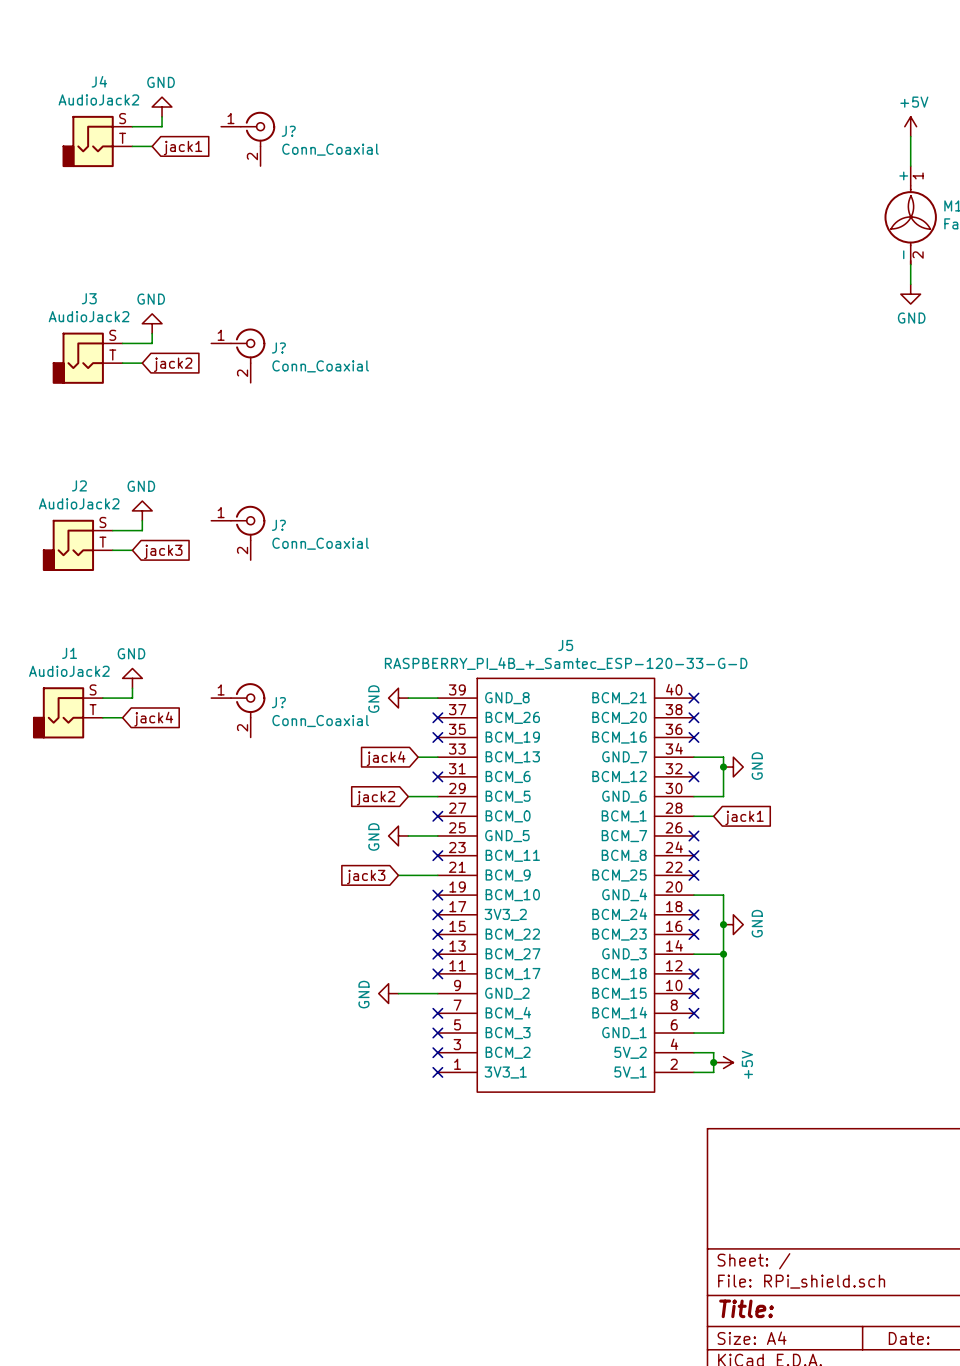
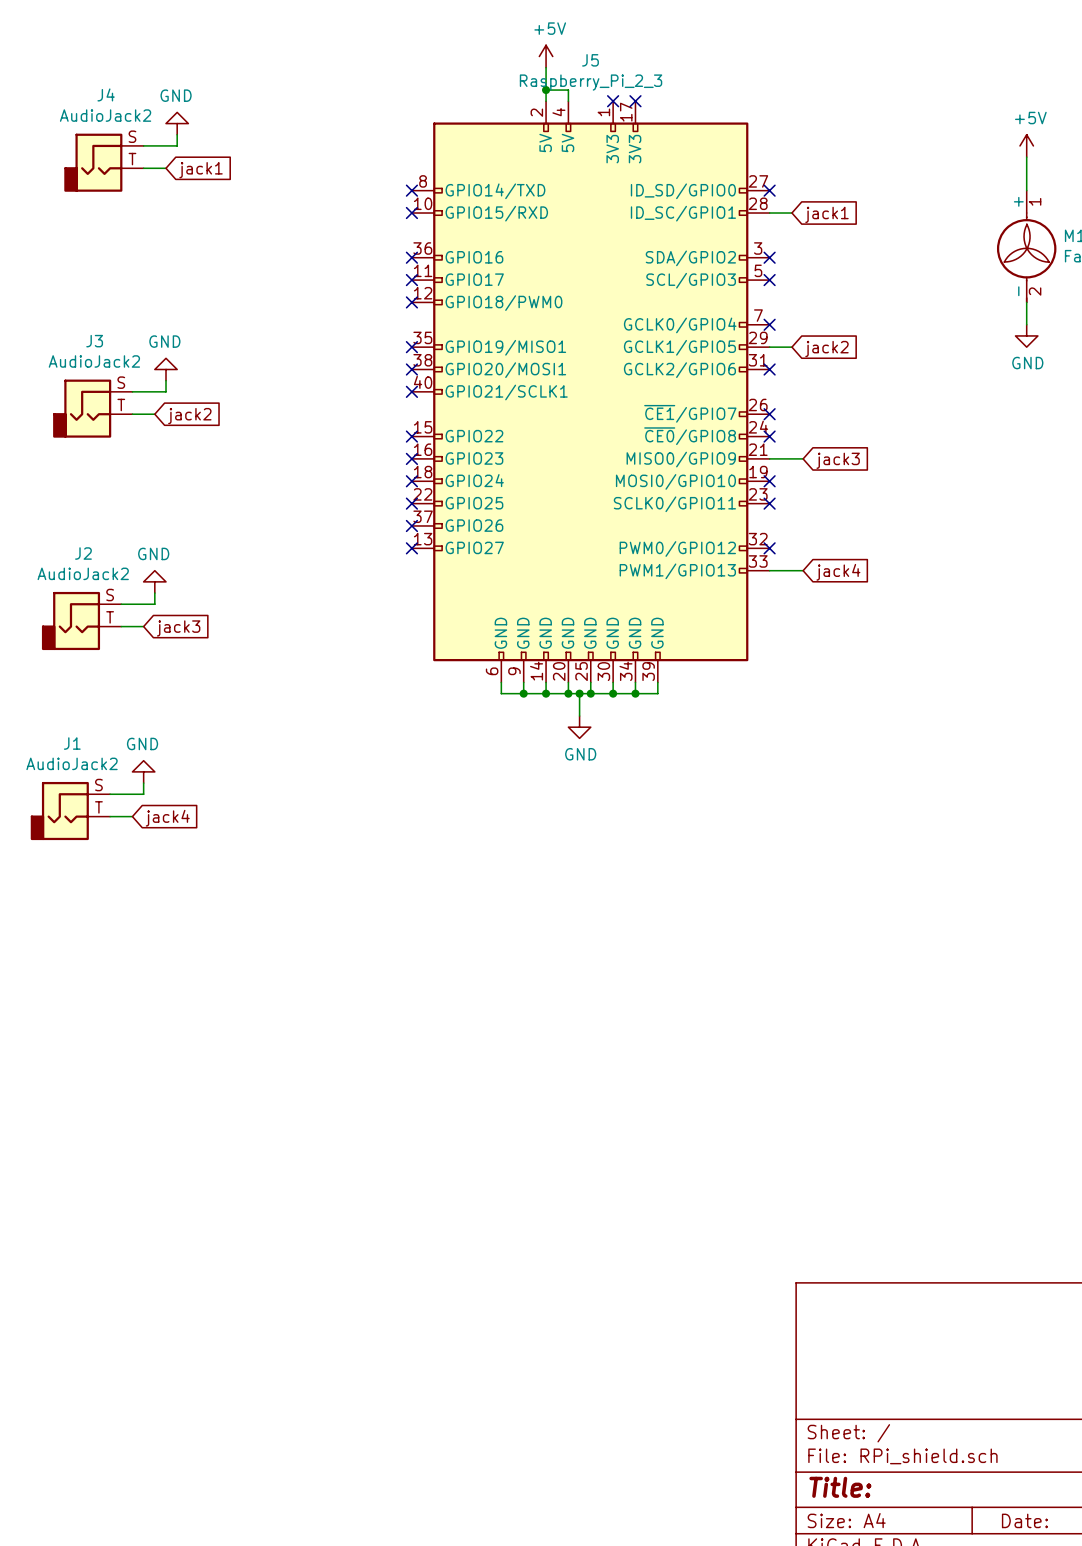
power symbol: none -> +5V (546, 56)
wire: none -> (546, 67) (546, 101)
wire: none -> (546, 90) (568, 90) (568, 101)
junction: none -> (546, 90)
no-connect mark: none -> (613, 101)
no-connect mark: none -> (635, 101)
J?: Conn_Coaxial (248, 138) -> none
no-connect mark: none -> (411, 190)
no-connect mark: none -> (769, 190)
no-connect mark: none -> (411, 213)
wire: none -> (769, 213) (791, 213)
global label: none -> jack1 (826, 214)
no-connect mark: none -> (411, 257)
no-connect mark: none -> (769, 257)
no-connect mark: none -> (411, 280)
no-connect mark: none -> (769, 280)
no-connect mark: none -> (411, 302)
no-connect mark: none -> (769, 324)
no-connect mark: none -> (411, 347)
wire: none -> (769, 347) (791, 347)
global label: none -> jack2 (826, 349)
no-connect mark: none -> (411, 369)
no-connect mark: none -> (769, 369)
no-connect mark: none -> (411, 391)
J?: Conn_Coaxial (238, 355) -> none
no-connect mark: none -> (769, 414)
no-connect mark: none -> (411, 436)
no-connect mark: none -> (769, 436)
no-connect mark: none -> (411, 458)
wire: none -> (769, 458) (803, 458)
global label: none -> jack3 (838, 460)
no-connect mark: none -> (411, 481)
no-connect mark: none -> (769, 481)
no-connect mark: none -> (411, 503)
no-connect mark: none -> (769, 503)
no-connect mark: none -> (411, 525)
no-connect mark: none -> (411, 548)
no-connect mark: none -> (769, 548)
wire: none -> (769, 570) (803, 570)
global label: none -> jack4 (838, 572)
J?: Conn_Coaxial (238, 532) -> none
wire: none -> (501, 682) (501, 693) (657, 693) (657, 682)
wire: none -> (523, 682) (523, 693)
wire: none -> (546, 682) (546, 693)
wire: none -> (568, 682) (568, 693)
wire: none -> (590, 682) (590, 693)
wire: none -> (613, 682) (613, 693)
wire: none -> (635, 682) (635, 693)
junction: none -> (523, 693)
junction: none -> (546, 693)
junction: none -> (568, 693)
wire: none -> (579, 693) (579, 716)
junction: none -> (579, 693)
junction: none -> (590, 693)
junction: none -> (613, 693)
junction: none -> (635, 693)
power symbol: none -> GND (579, 727)
J5 name position: J5 (565, 645) -> J5 (590, 60)
J5 value: RASPBERRY_PI_4B_+_Samtec_ESP-120-33-G-D (566, 663) -> Raspberry_Pi_2_3 (591, 82)
J5 symbol: [437, 677, 694, 1093] -> [411, 101, 770, 683]
power symbol: GND (398, 698) -> none
wire: (408, 698) (437, 698) -> none
no-connect mark: (693, 698) -> none
J?: Conn_Coaxial (238, 710) -> none
no-connect mark: (437, 717) -> none
no-connect mark: (693, 717) -> none
no-connect mark: (437, 737) -> none
no-connect mark: (693, 737) -> none
wire: (418, 757) (437, 757) -> none
wire: (693, 757) (723, 757) (723, 796) (693, 796) -> none
global label: jack4 (386, 758) -> none
junction: (723, 767) -> none
power symbol: GND (733, 767) -> none
no-connect mark: (437, 776) -> none
no-connect mark: (693, 776) -> none
wire: (408, 796) (437, 796) -> none
global label: jack2 (376, 798) -> none
no-connect mark: (437, 816) -> none
wire: (693, 816) (713, 816) -> none
global label: jack1 (744, 817) -> none
power symbol: GND (398, 835) -> none
wire: (408, 835) (437, 835) -> none
no-connect mark: (693, 835) -> none
no-connect mark: (437, 855) -> none
no-connect mark: (693, 855) -> none
wire: (398, 875) (437, 875) -> none
no-connect mark: (693, 875) -> none
global label: jack3 (366, 877) -> none
no-connect mark: (437, 895) -> none
wire: (693, 895) (723, 895) (723, 1033) (693, 1033) -> none
no-connect mark: (437, 914) -> none
no-connect mark: (693, 914) -> none
junction: (723, 924) -> none
power symbol: GND (733, 924) -> none
no-connect mark: (437, 934) -> none
no-connect mark: (693, 934) -> none
no-connect mark: (437, 954) -> none
wire: (693, 954) (723, 954) -> none
junction: (723, 954) -> none
no-connect mark: (437, 973) -> none
no-connect mark: (693, 973) -> none
power symbol: GND (388, 993) -> none
wire: (398, 993) (437, 993) -> none
no-connect mark: (693, 993) -> none
no-connect mark: (437, 1013) -> none
no-connect mark: (693, 1013) -> none
no-connect mark: (437, 1033) -> none
no-connect mark: (437, 1052) -> none
wire: (693, 1052) (713, 1052) (713, 1072) (693, 1072) -> none
junction: (713, 1062) -> none
power symbol: +5V (723, 1062) -> none
no-connect mark: (437, 1072) -> none

